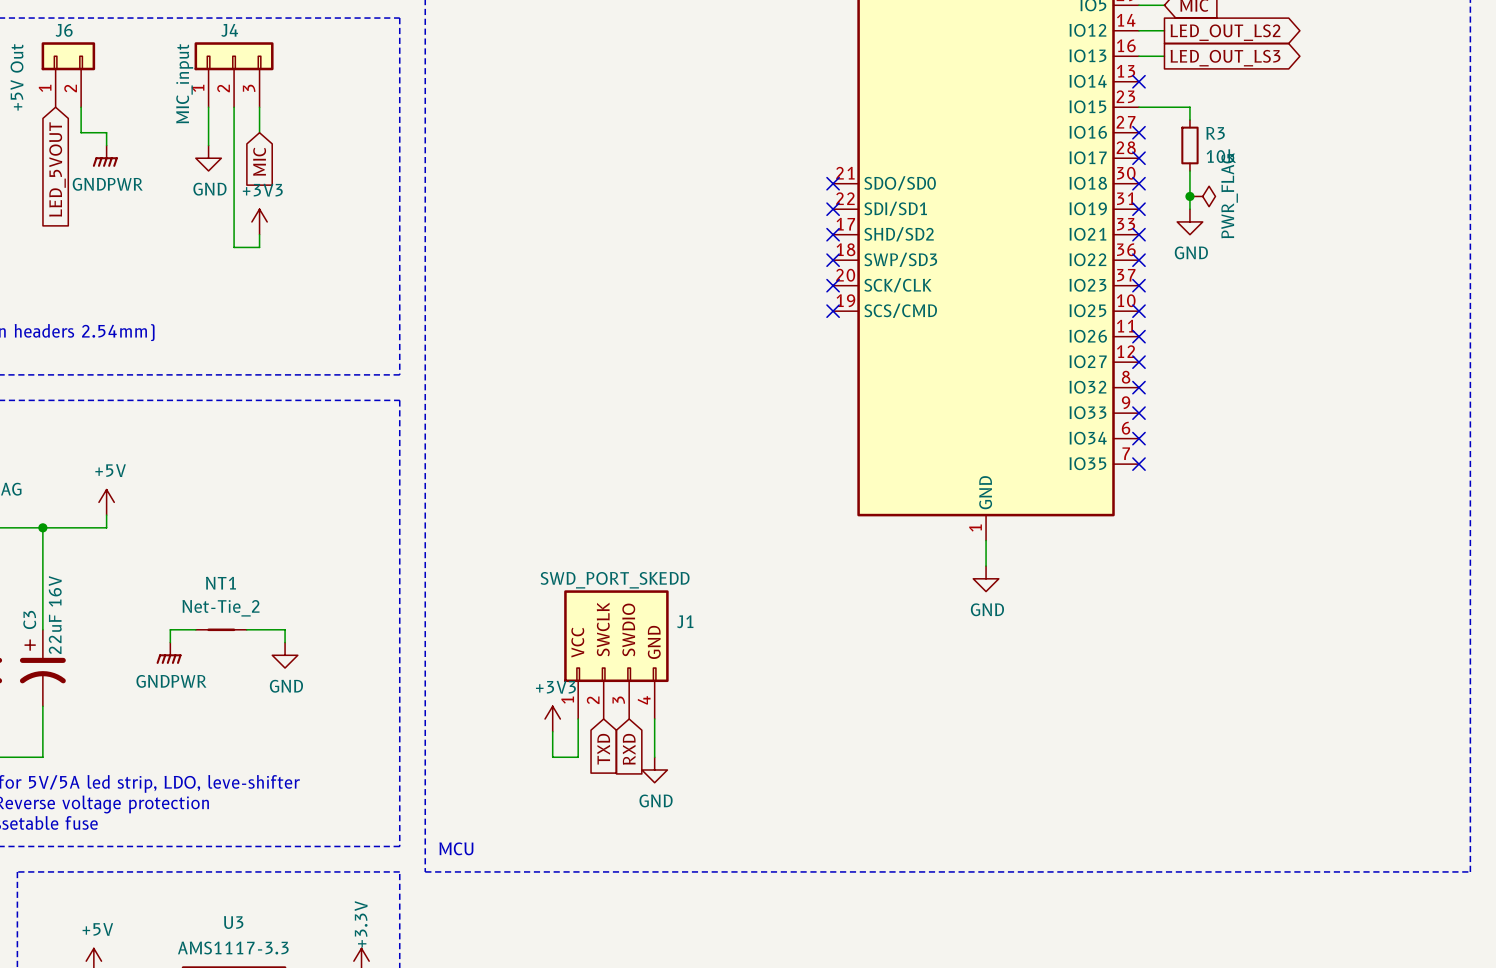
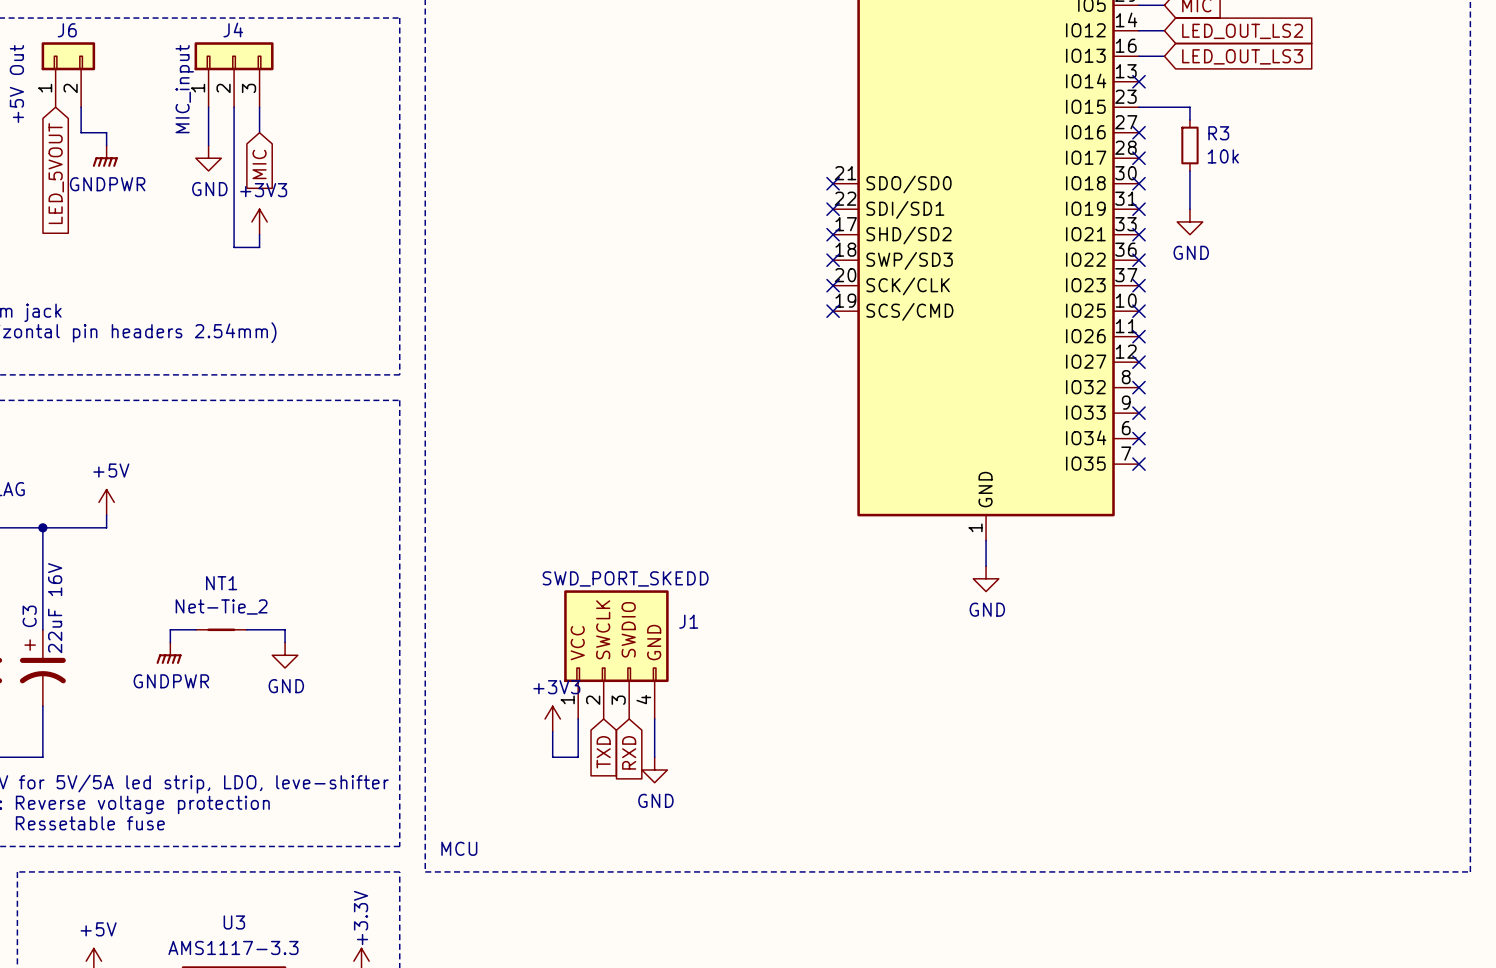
global label shape: output (1225, 32) -> input (1242, 31)
global label shape: output (1225, 58) -> input (1242, 56)
junction: (1189, 196) -> none
power symbol: PWR_FLAG (1202, 196) -> none

